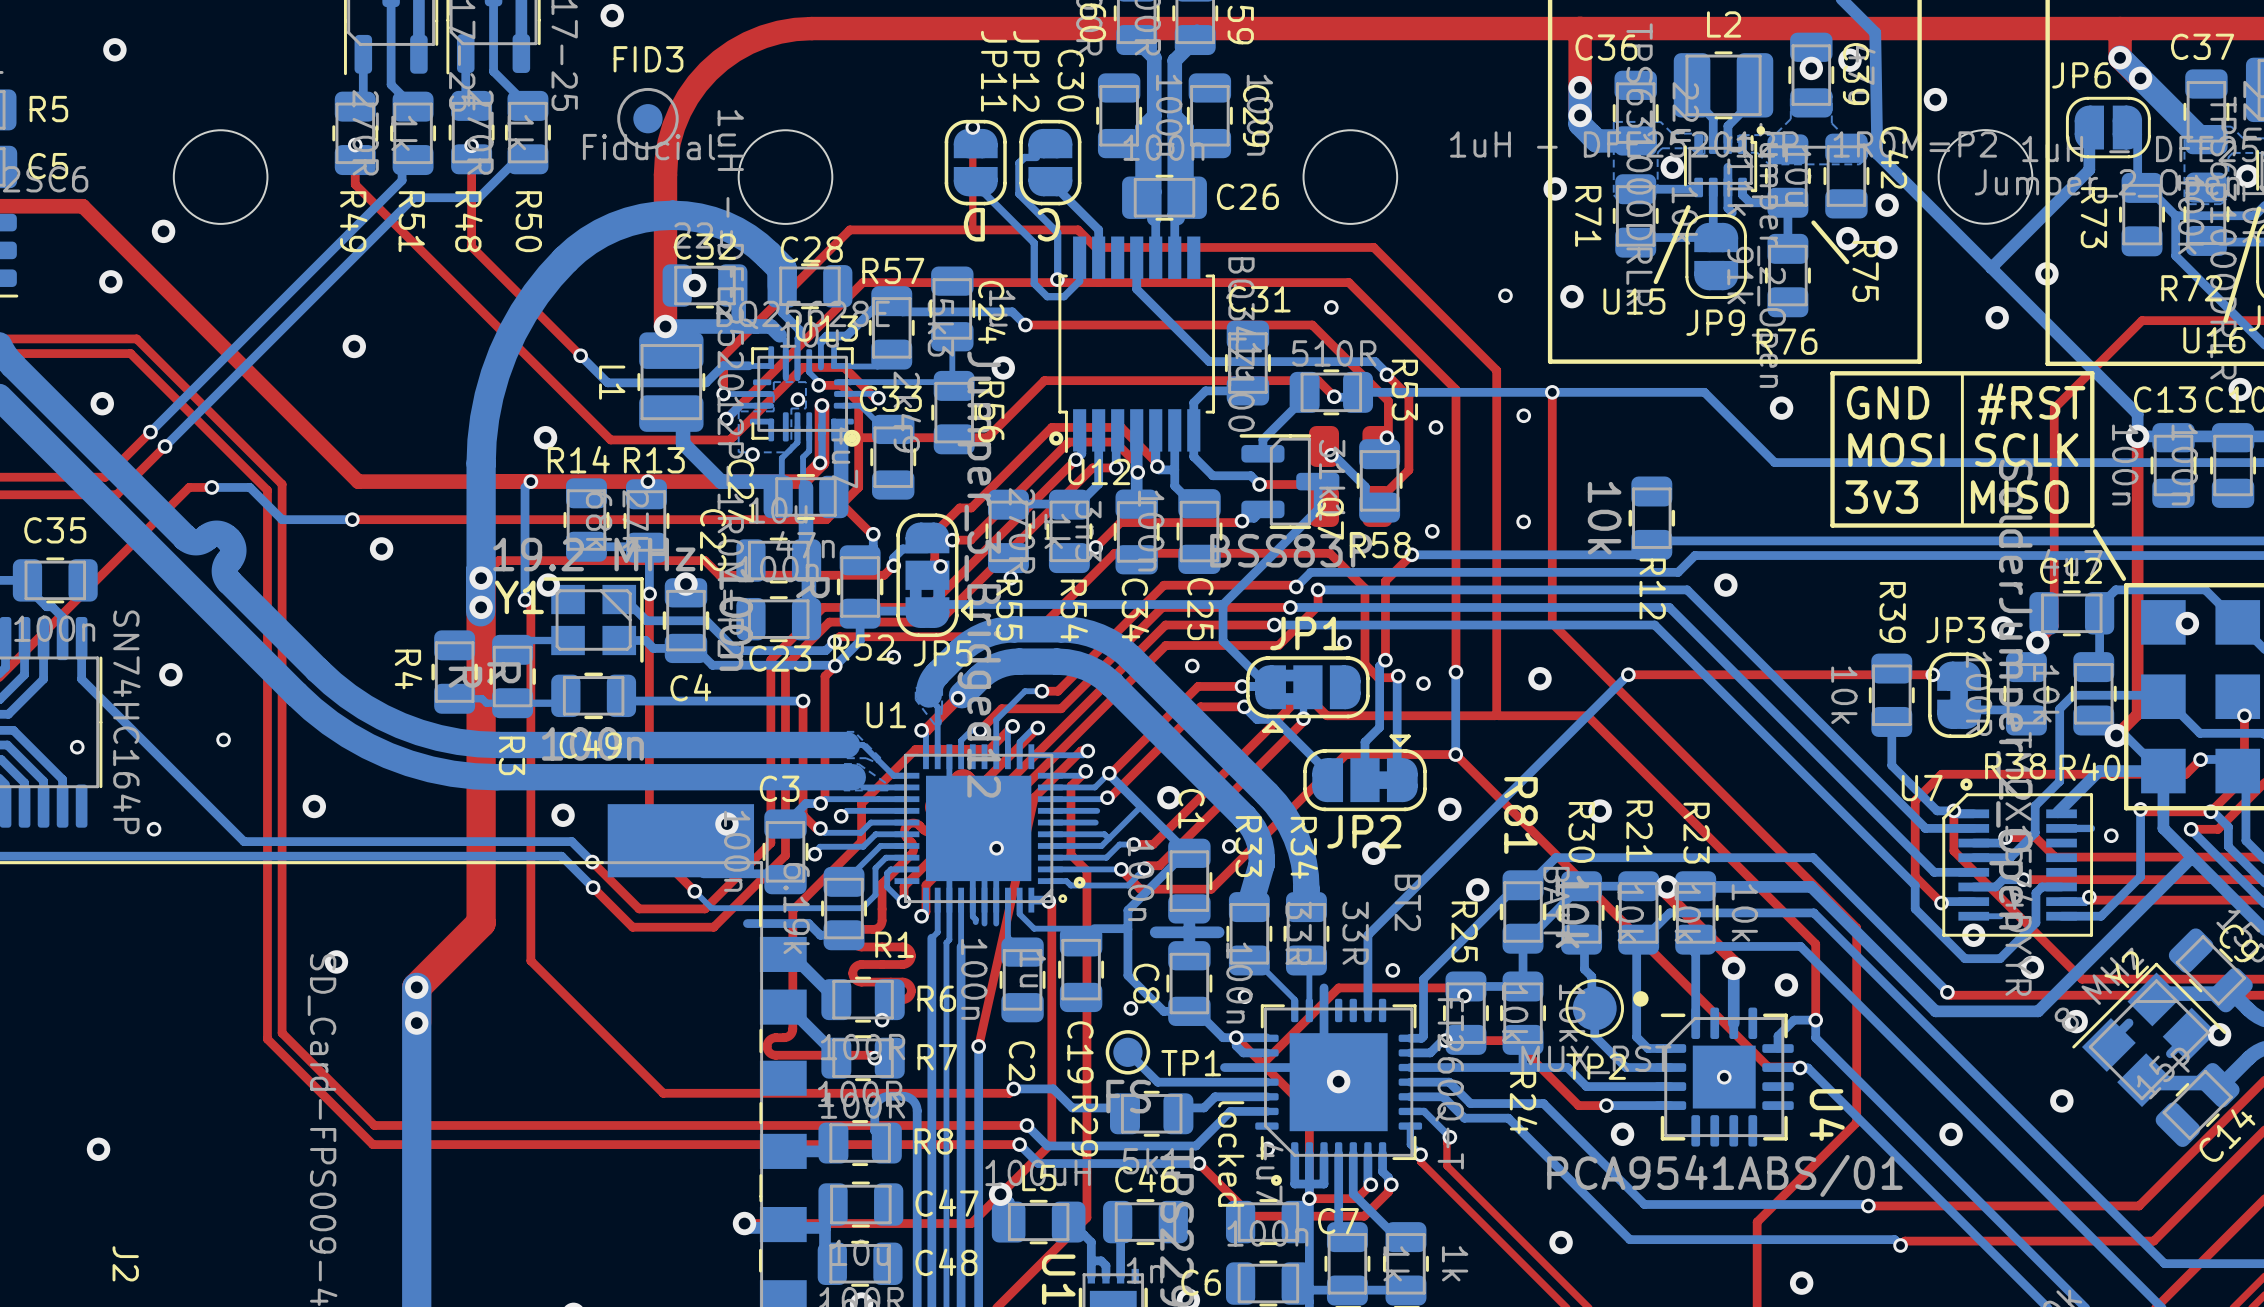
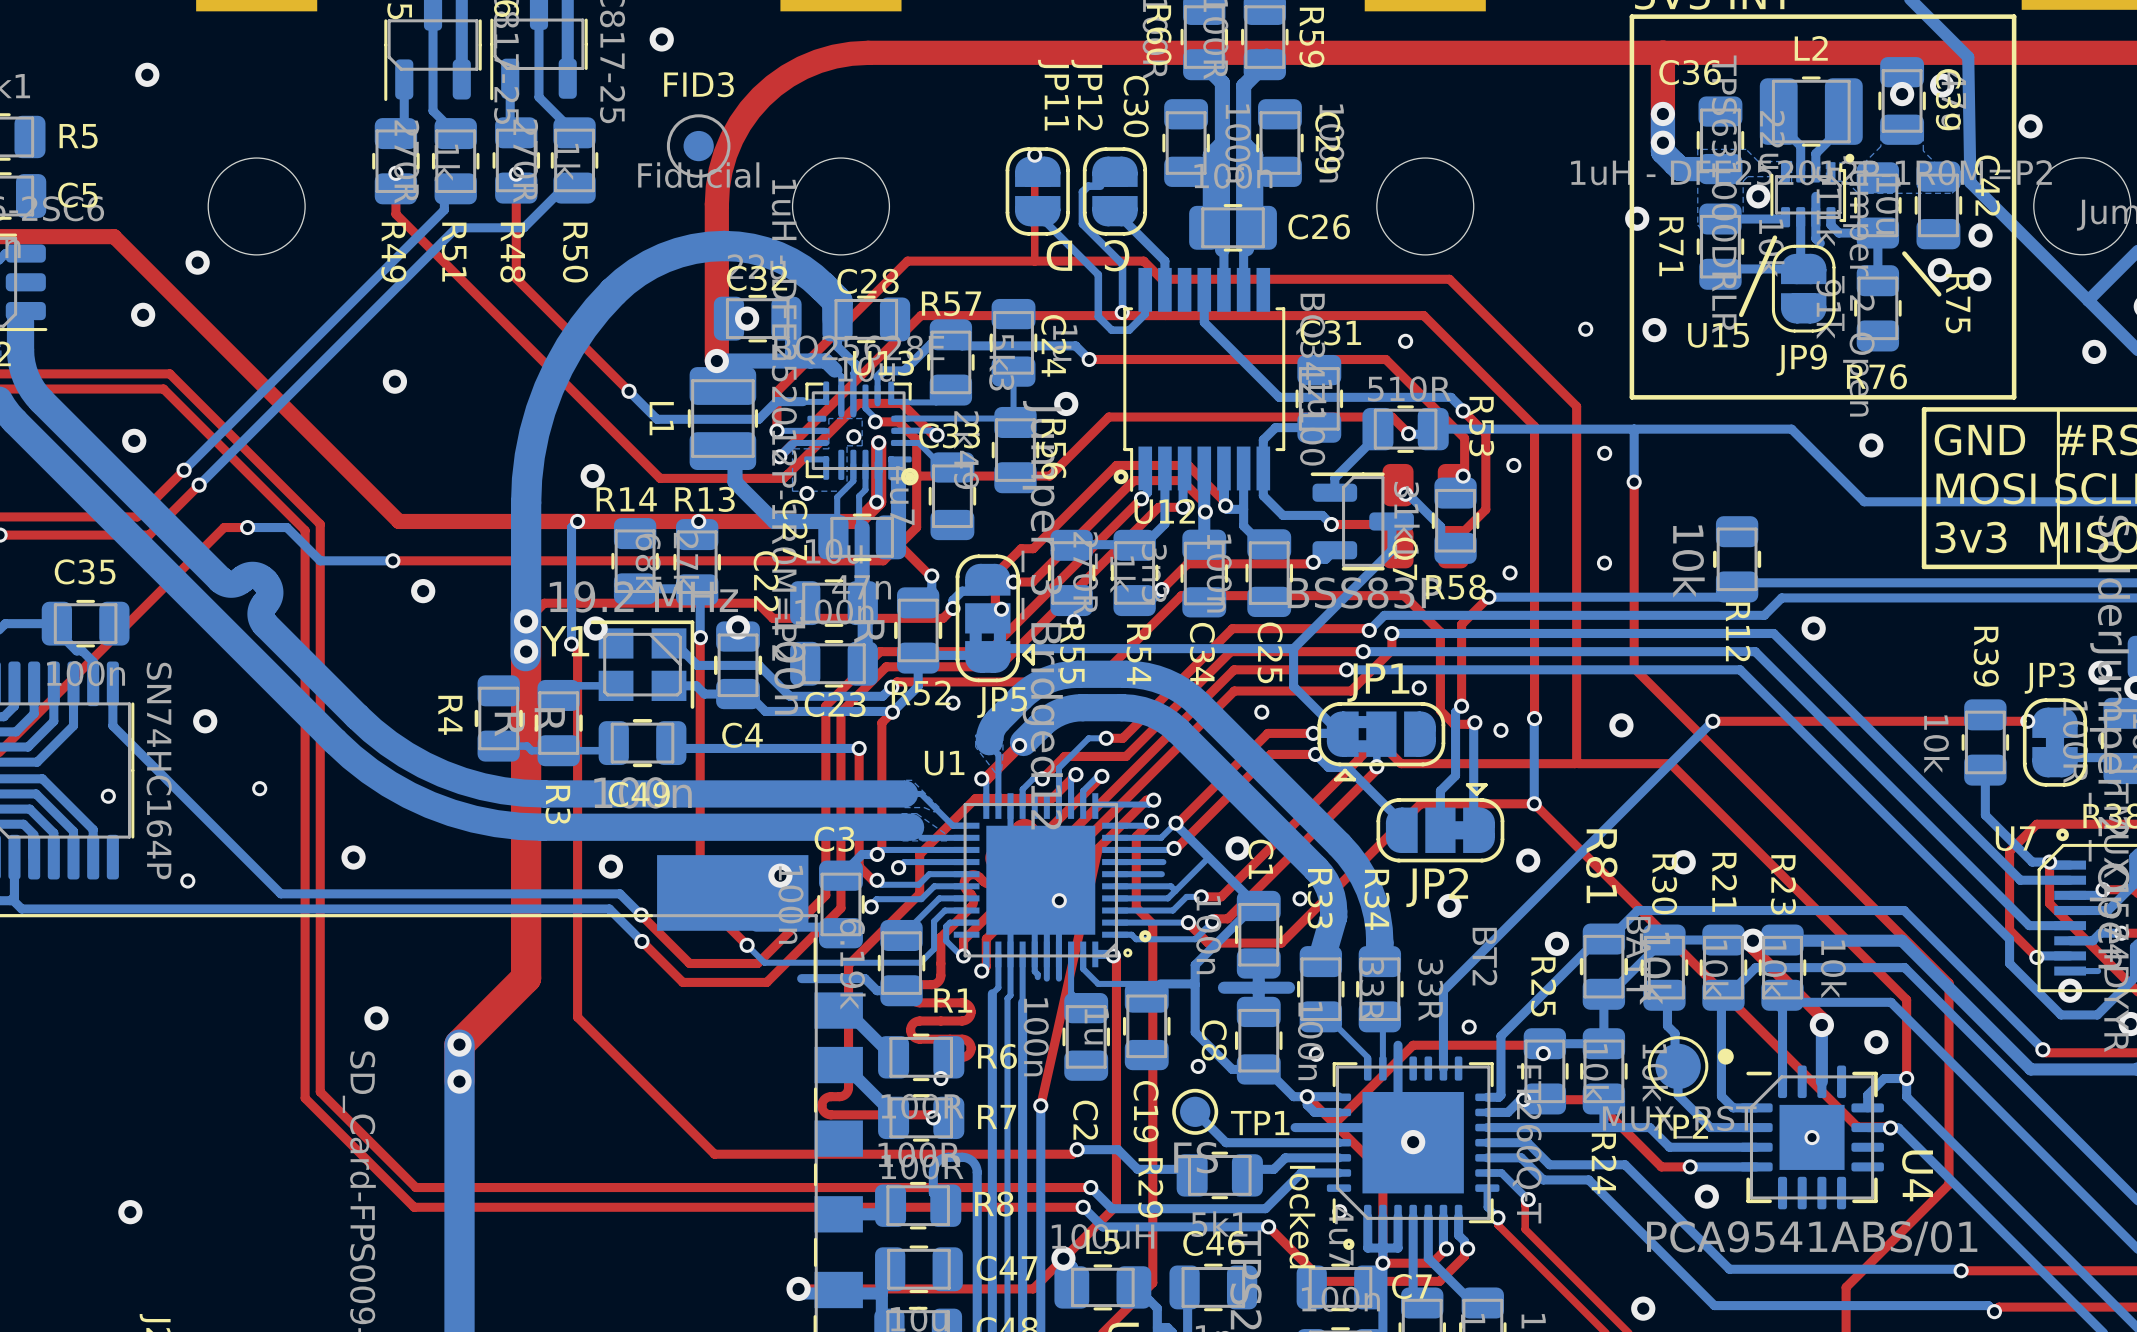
bottom track: none -> (1634, 429) (1634, 482)
top track: (1552, 392) (1552, 443) -> none
via position: (1552, 392) -> (1634, 482)
via: (1951, 1134) -> none

